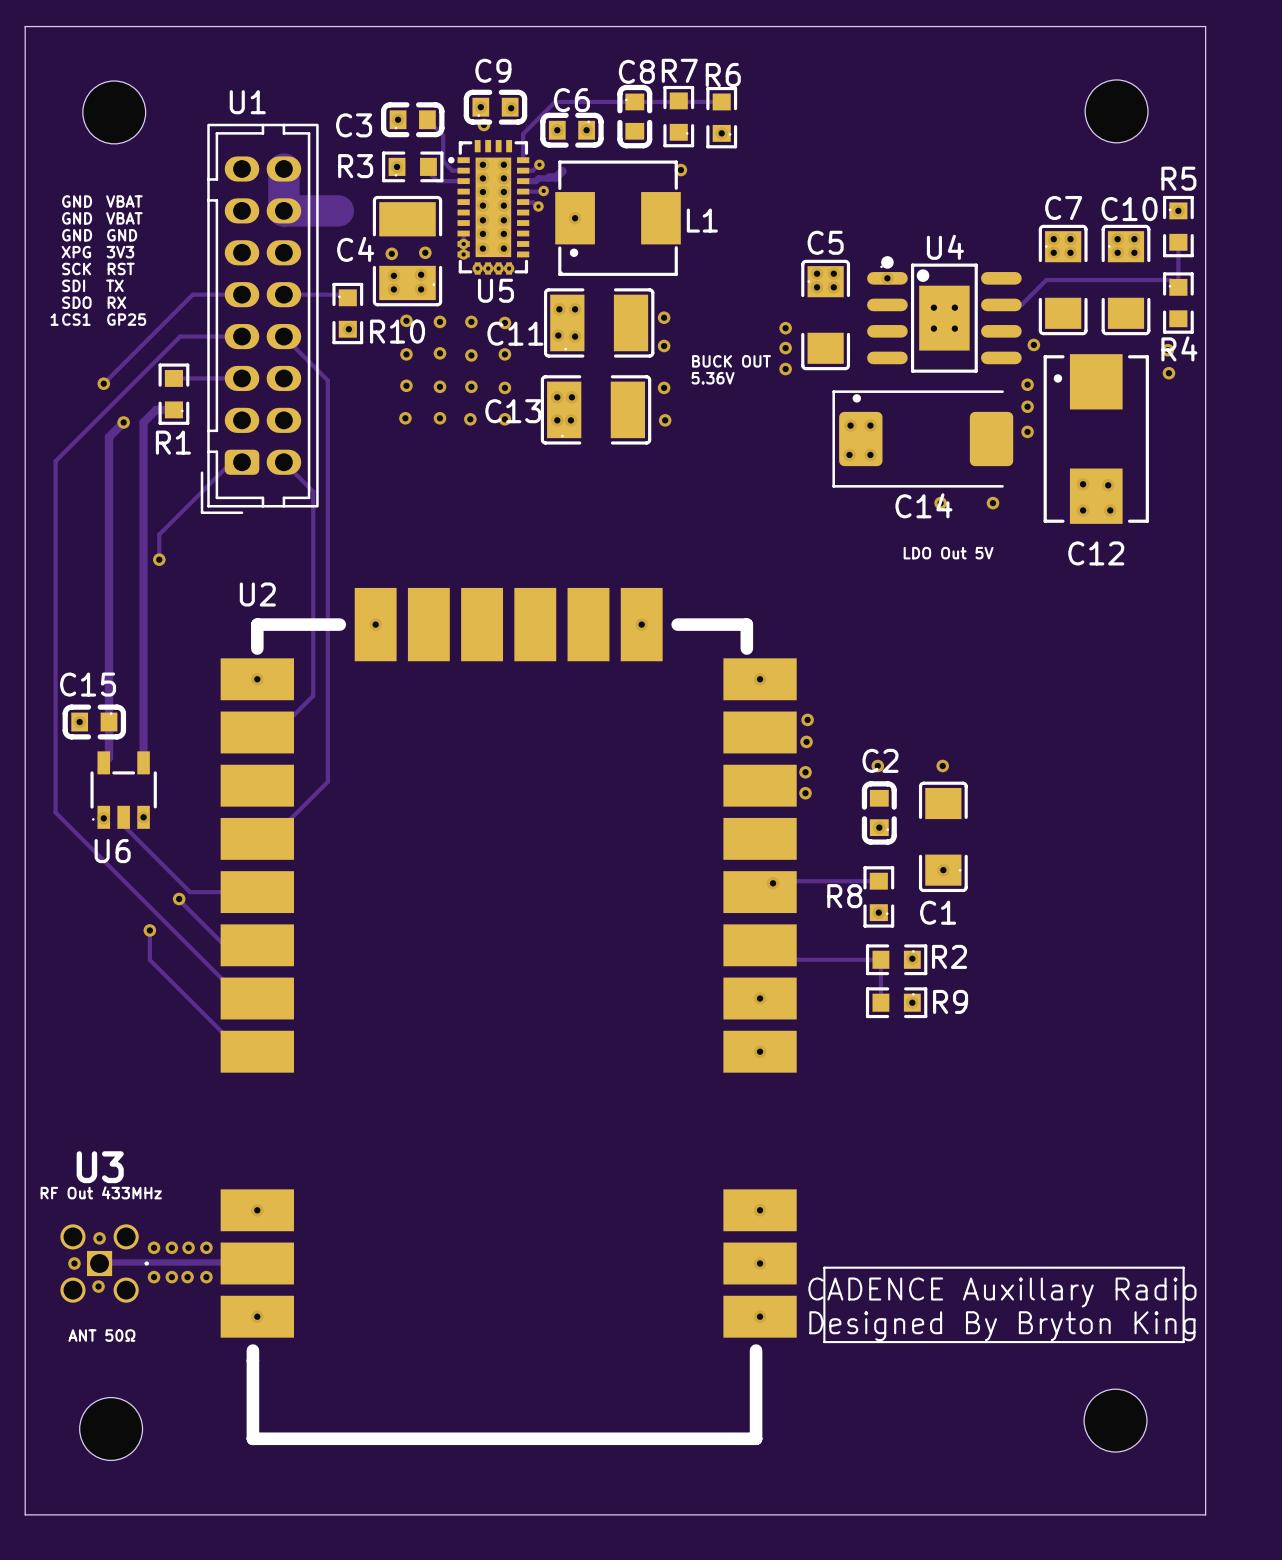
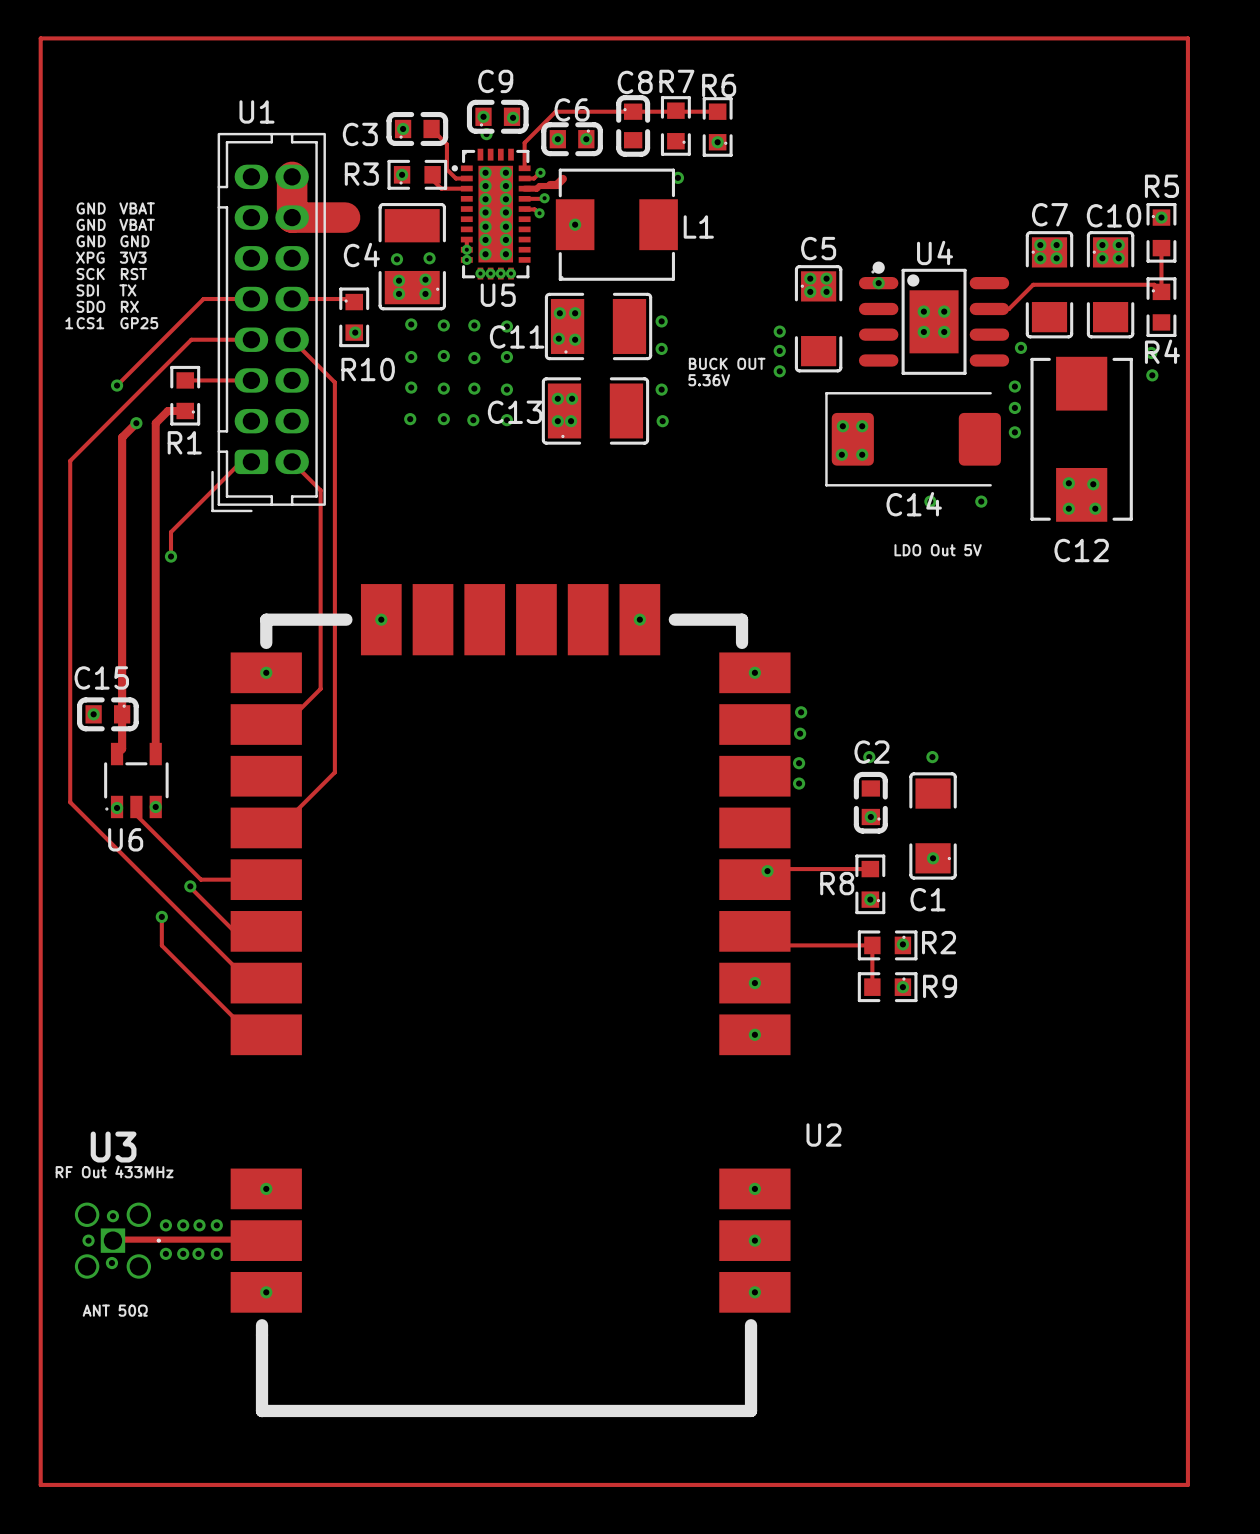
board edge: (25, 26) (1205, 26) (1205, 1514) (25, 1514) (25, 26) -> none
track: none -> (40, 38) (1187, 38) (1187, 1484) (40, 1484) (40, 38)
part: (1116, 111) -> none
part: (114, 112) -> none
drawing: [569, 248, 579, 257] -> none
R10 name position: R10 (397, 331) -> R10 (368, 369)
drawing: [1053, 374, 1063, 383] -> none
drawing: [852, 394, 862, 403] -> none
U2 name position: U2 (257, 594) -> U2 (823, 1135)
line: (824, 1267) (1183, 1267) (1183, 1342) (824, 1342) (824, 1267) -> none
text: CADENCE Auxillary Radio (1002, 1292) -> none
text: Designed By Bryton King (1002, 1326) -> none
part: (1115, 1420) -> none
part: (111, 1428) -> none

